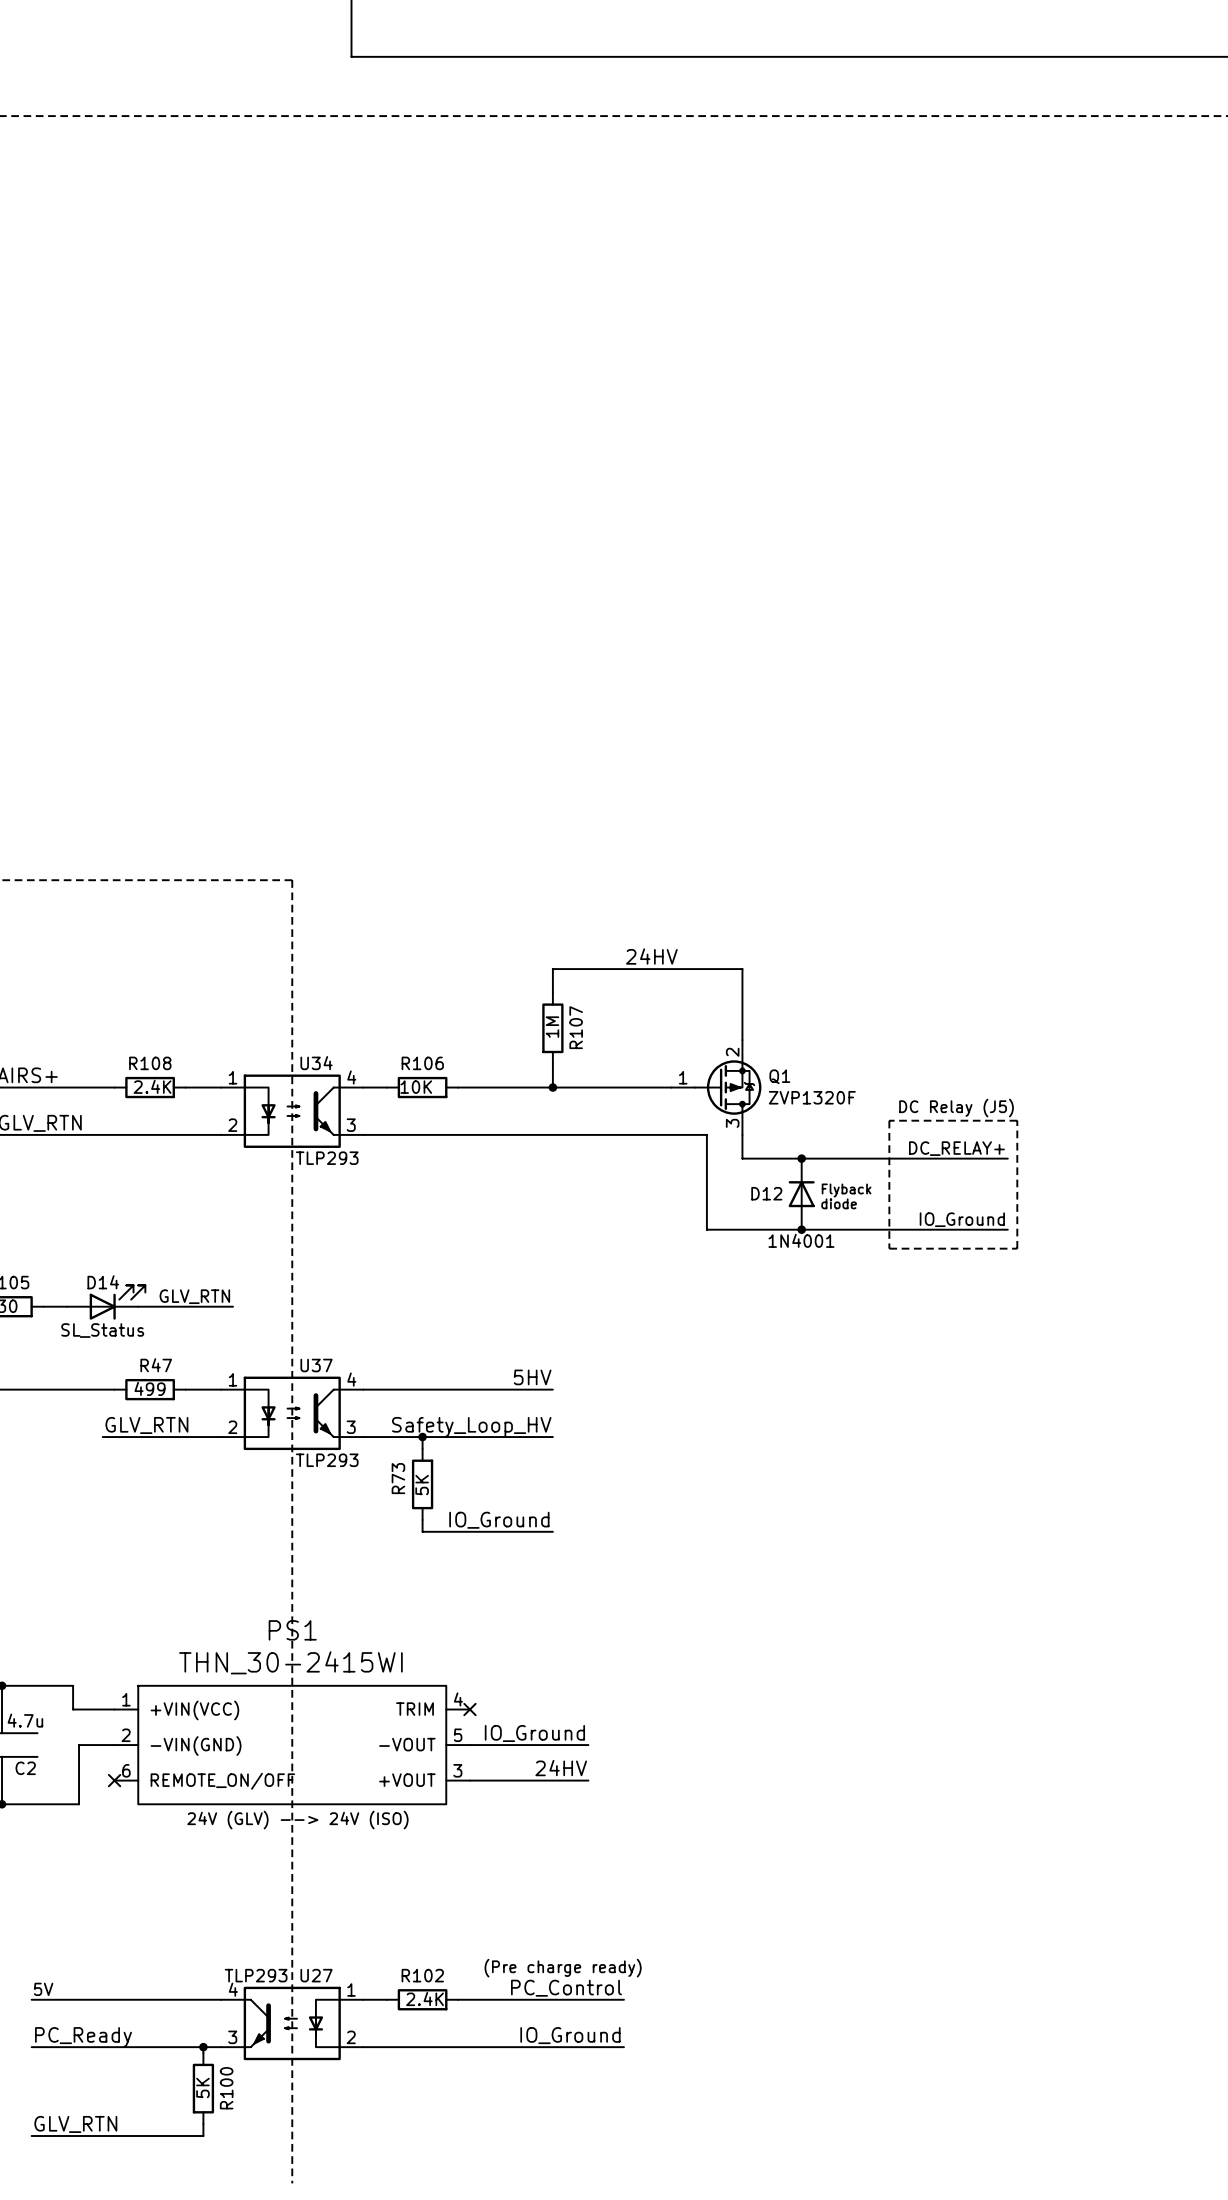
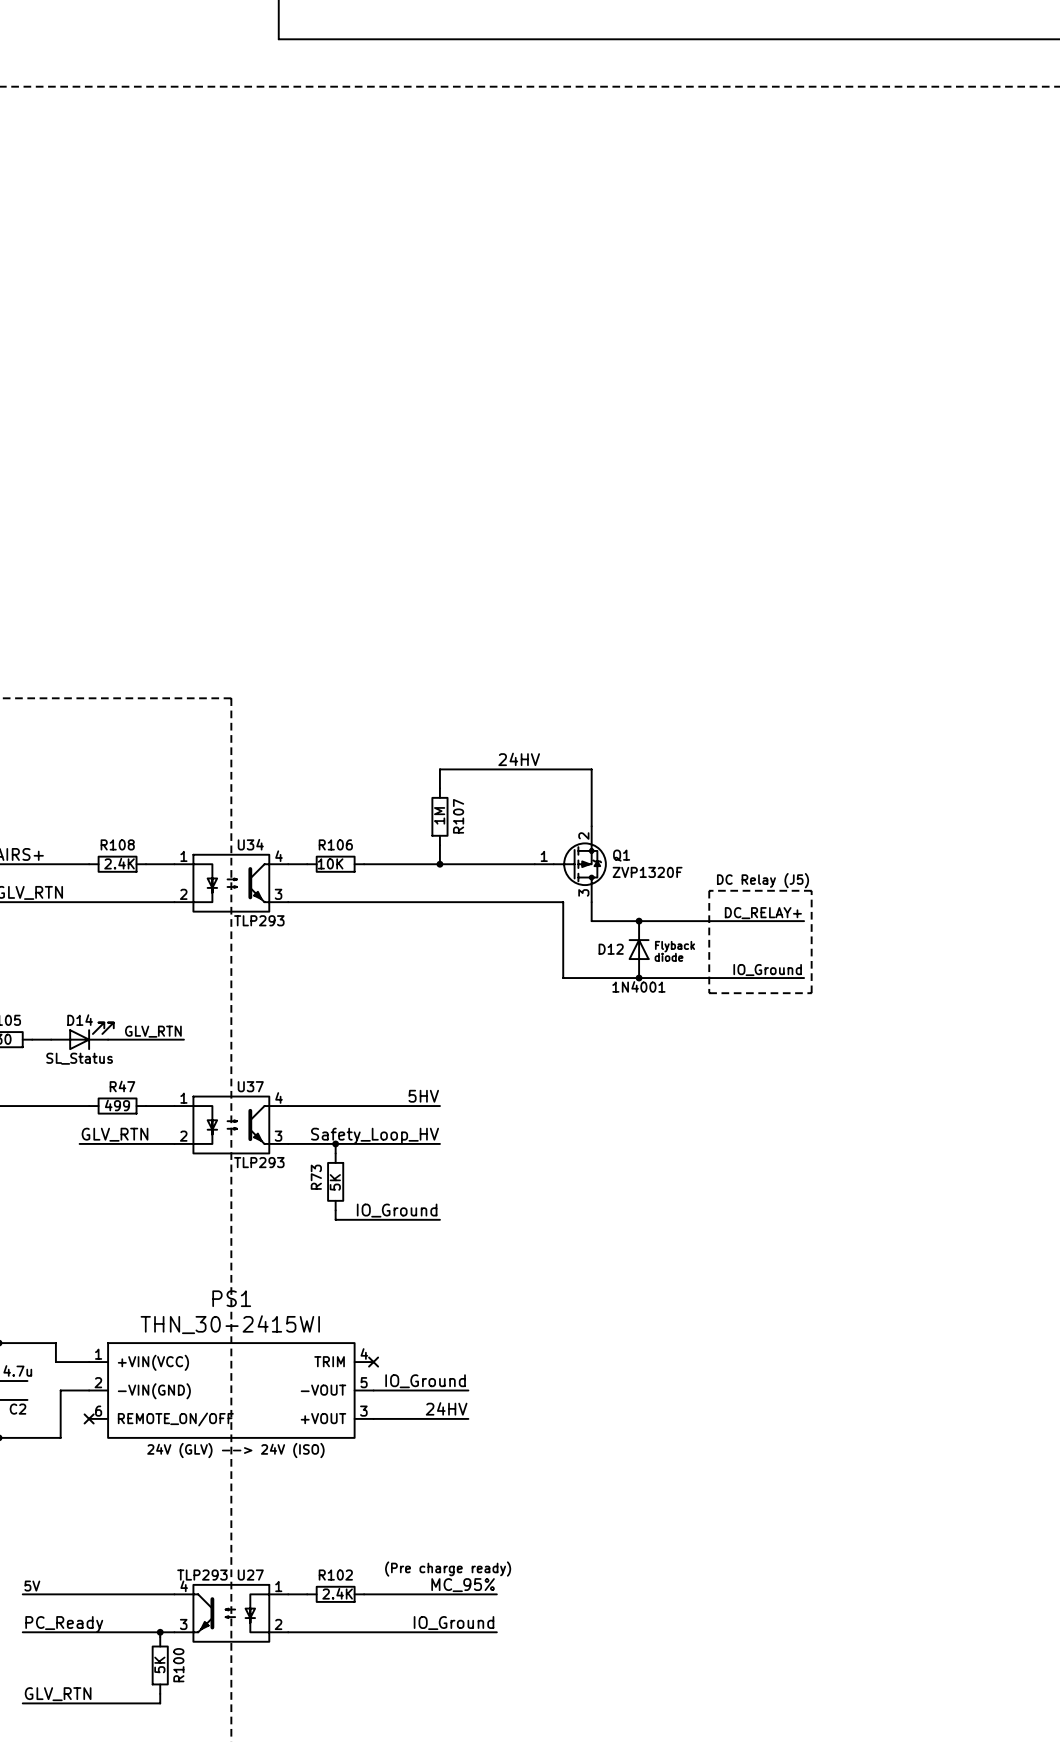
label: PC_Control (566, 1988) -> MC_95% (463, 1585)

